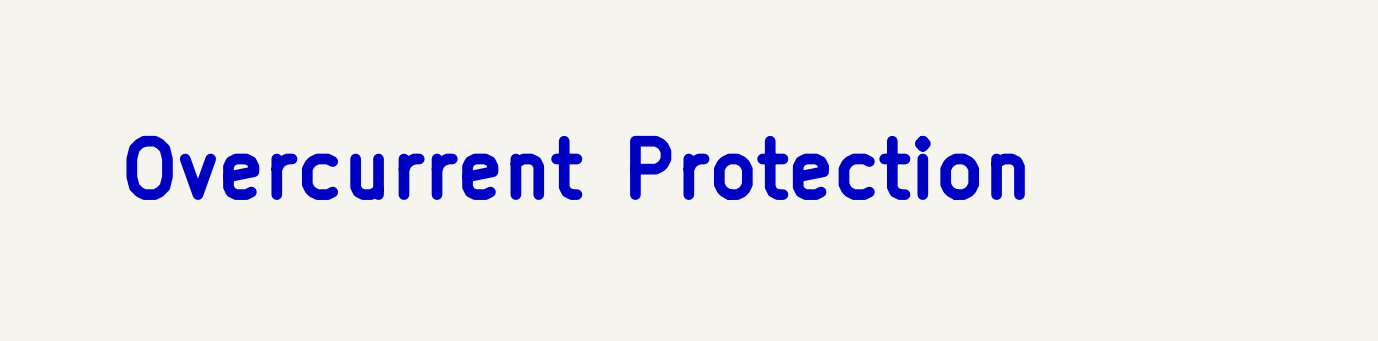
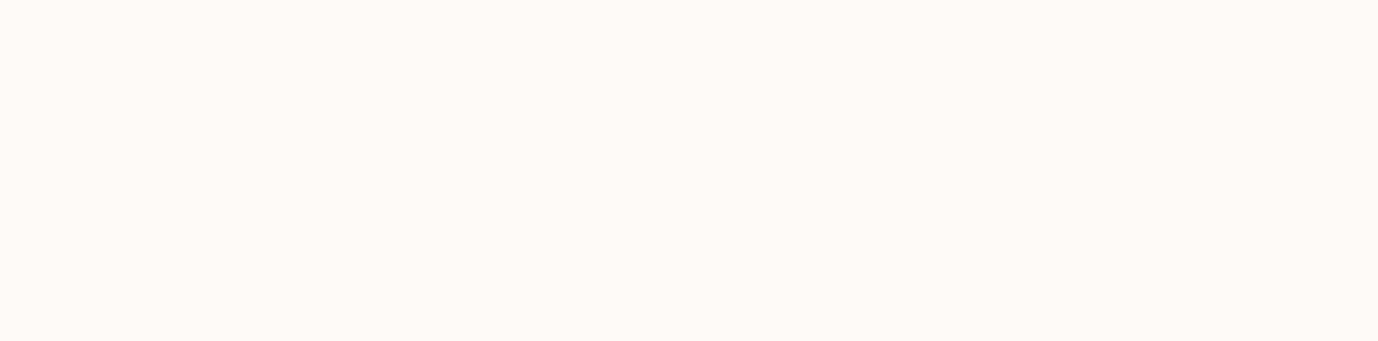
text: Overcurrent Protection (575, 167) -> none

